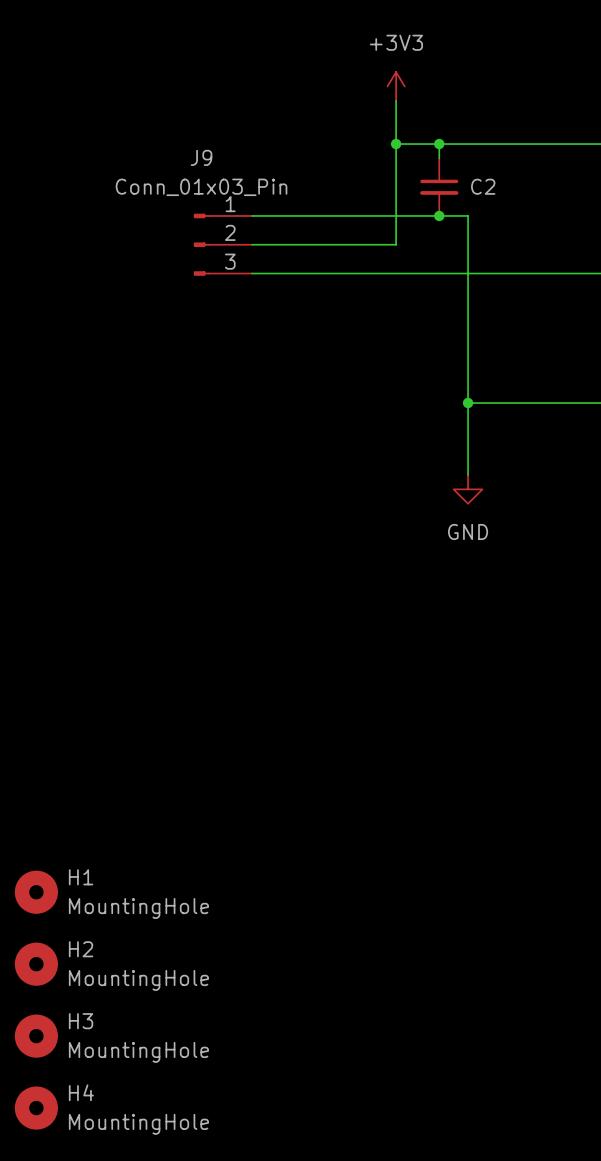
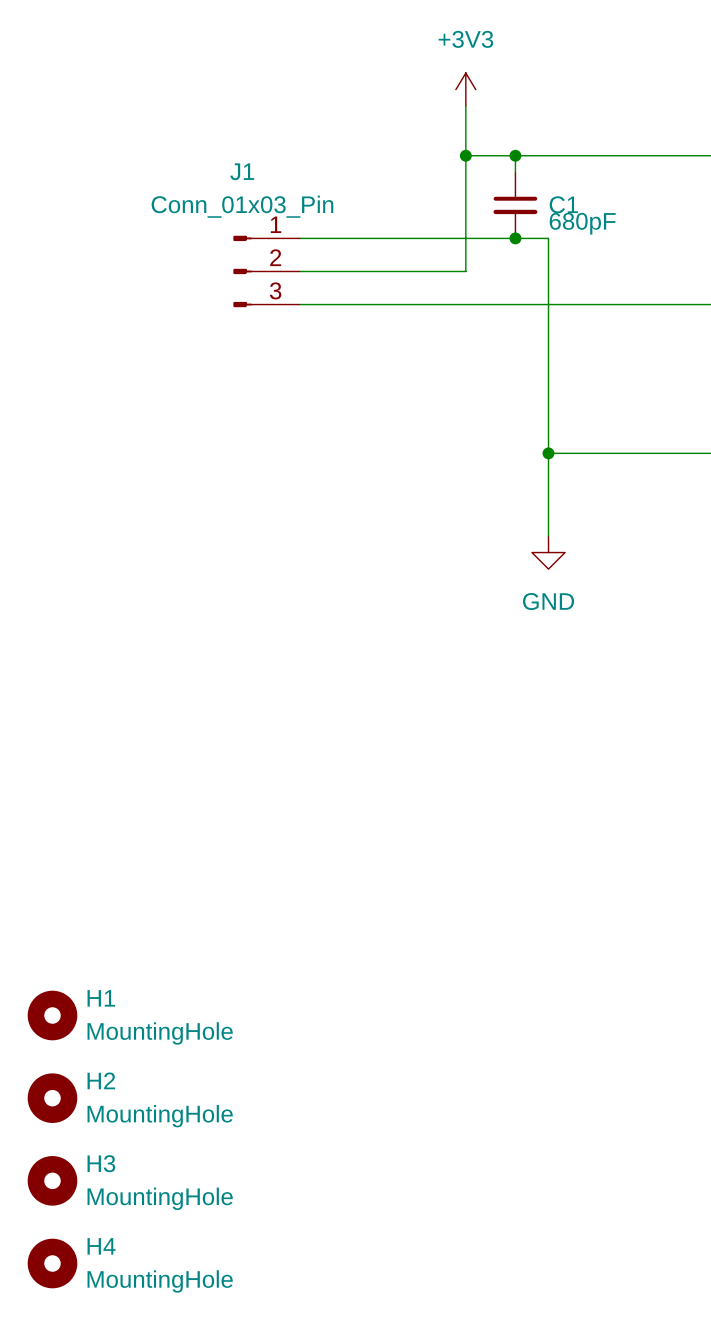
J9 name: J9 (201, 157) -> J1 (242, 171)
C2 name: C2 (483, 186) -> C1 (563, 204)
C2 value: none -> 680pF (582, 223)

